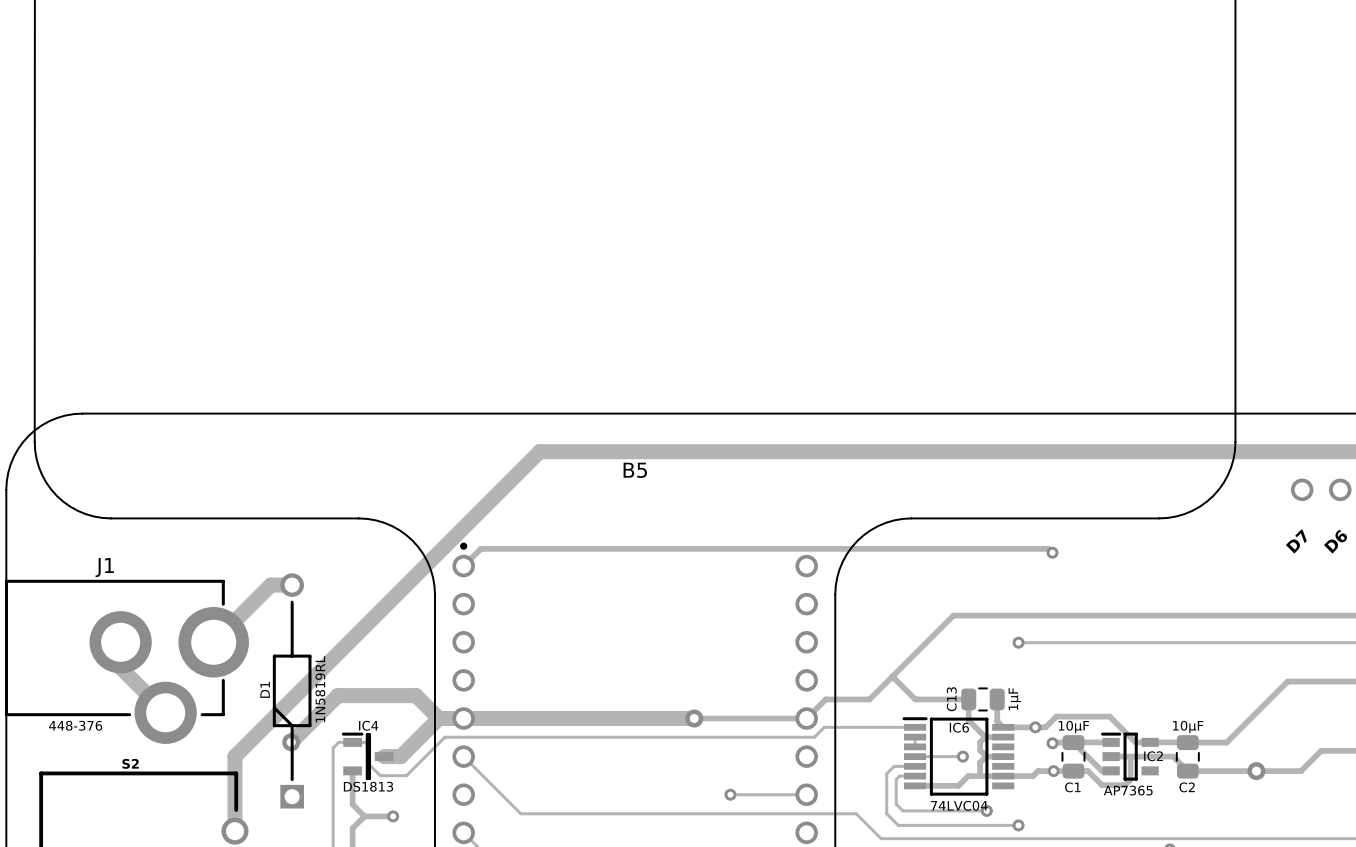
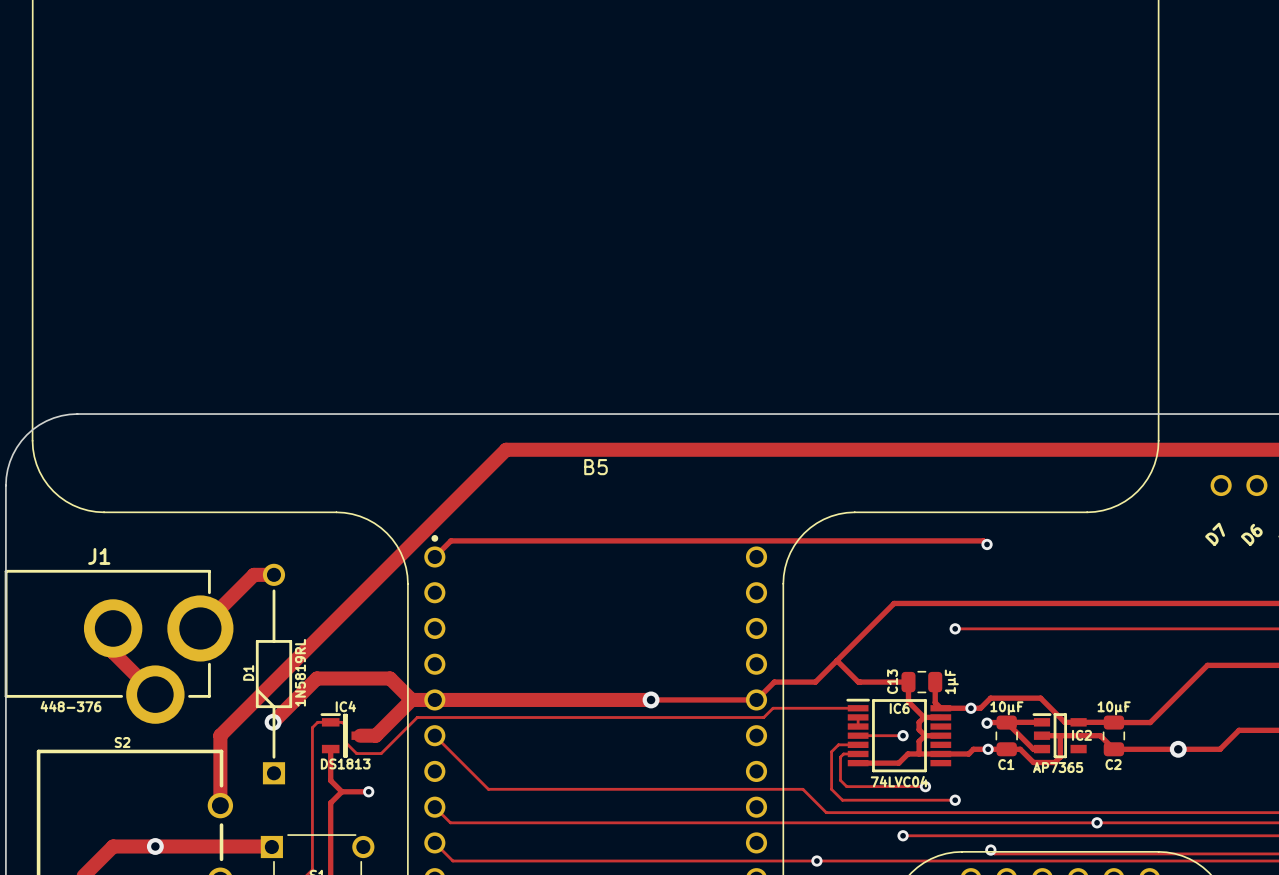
track: (730, 794) (806, 794) -> none
via: (730, 794) -> none

